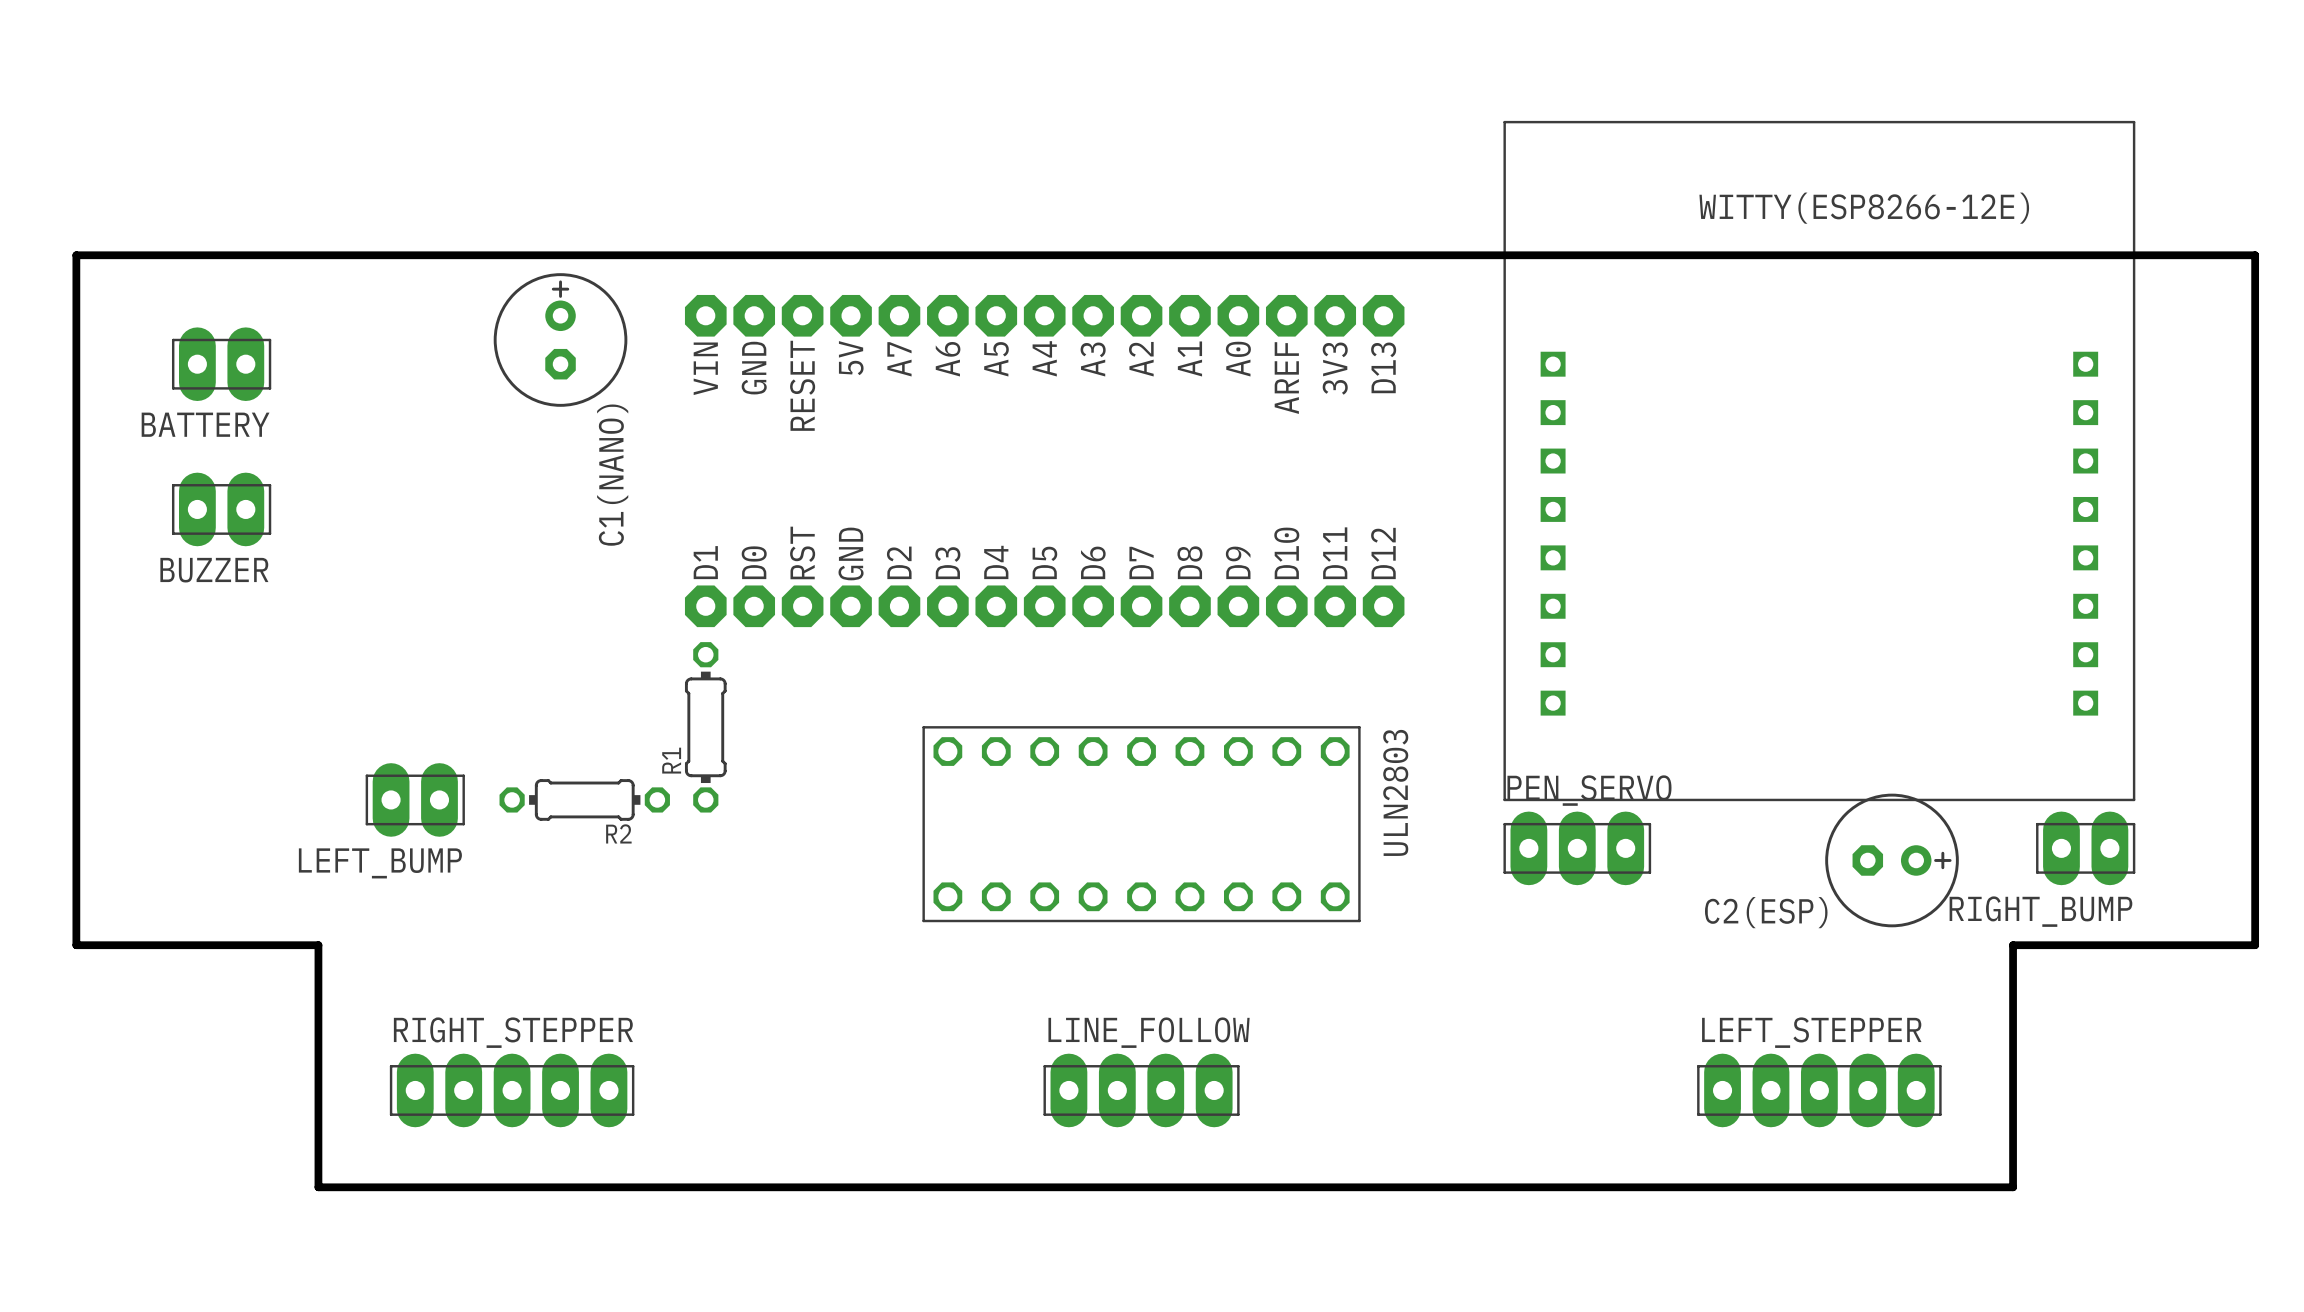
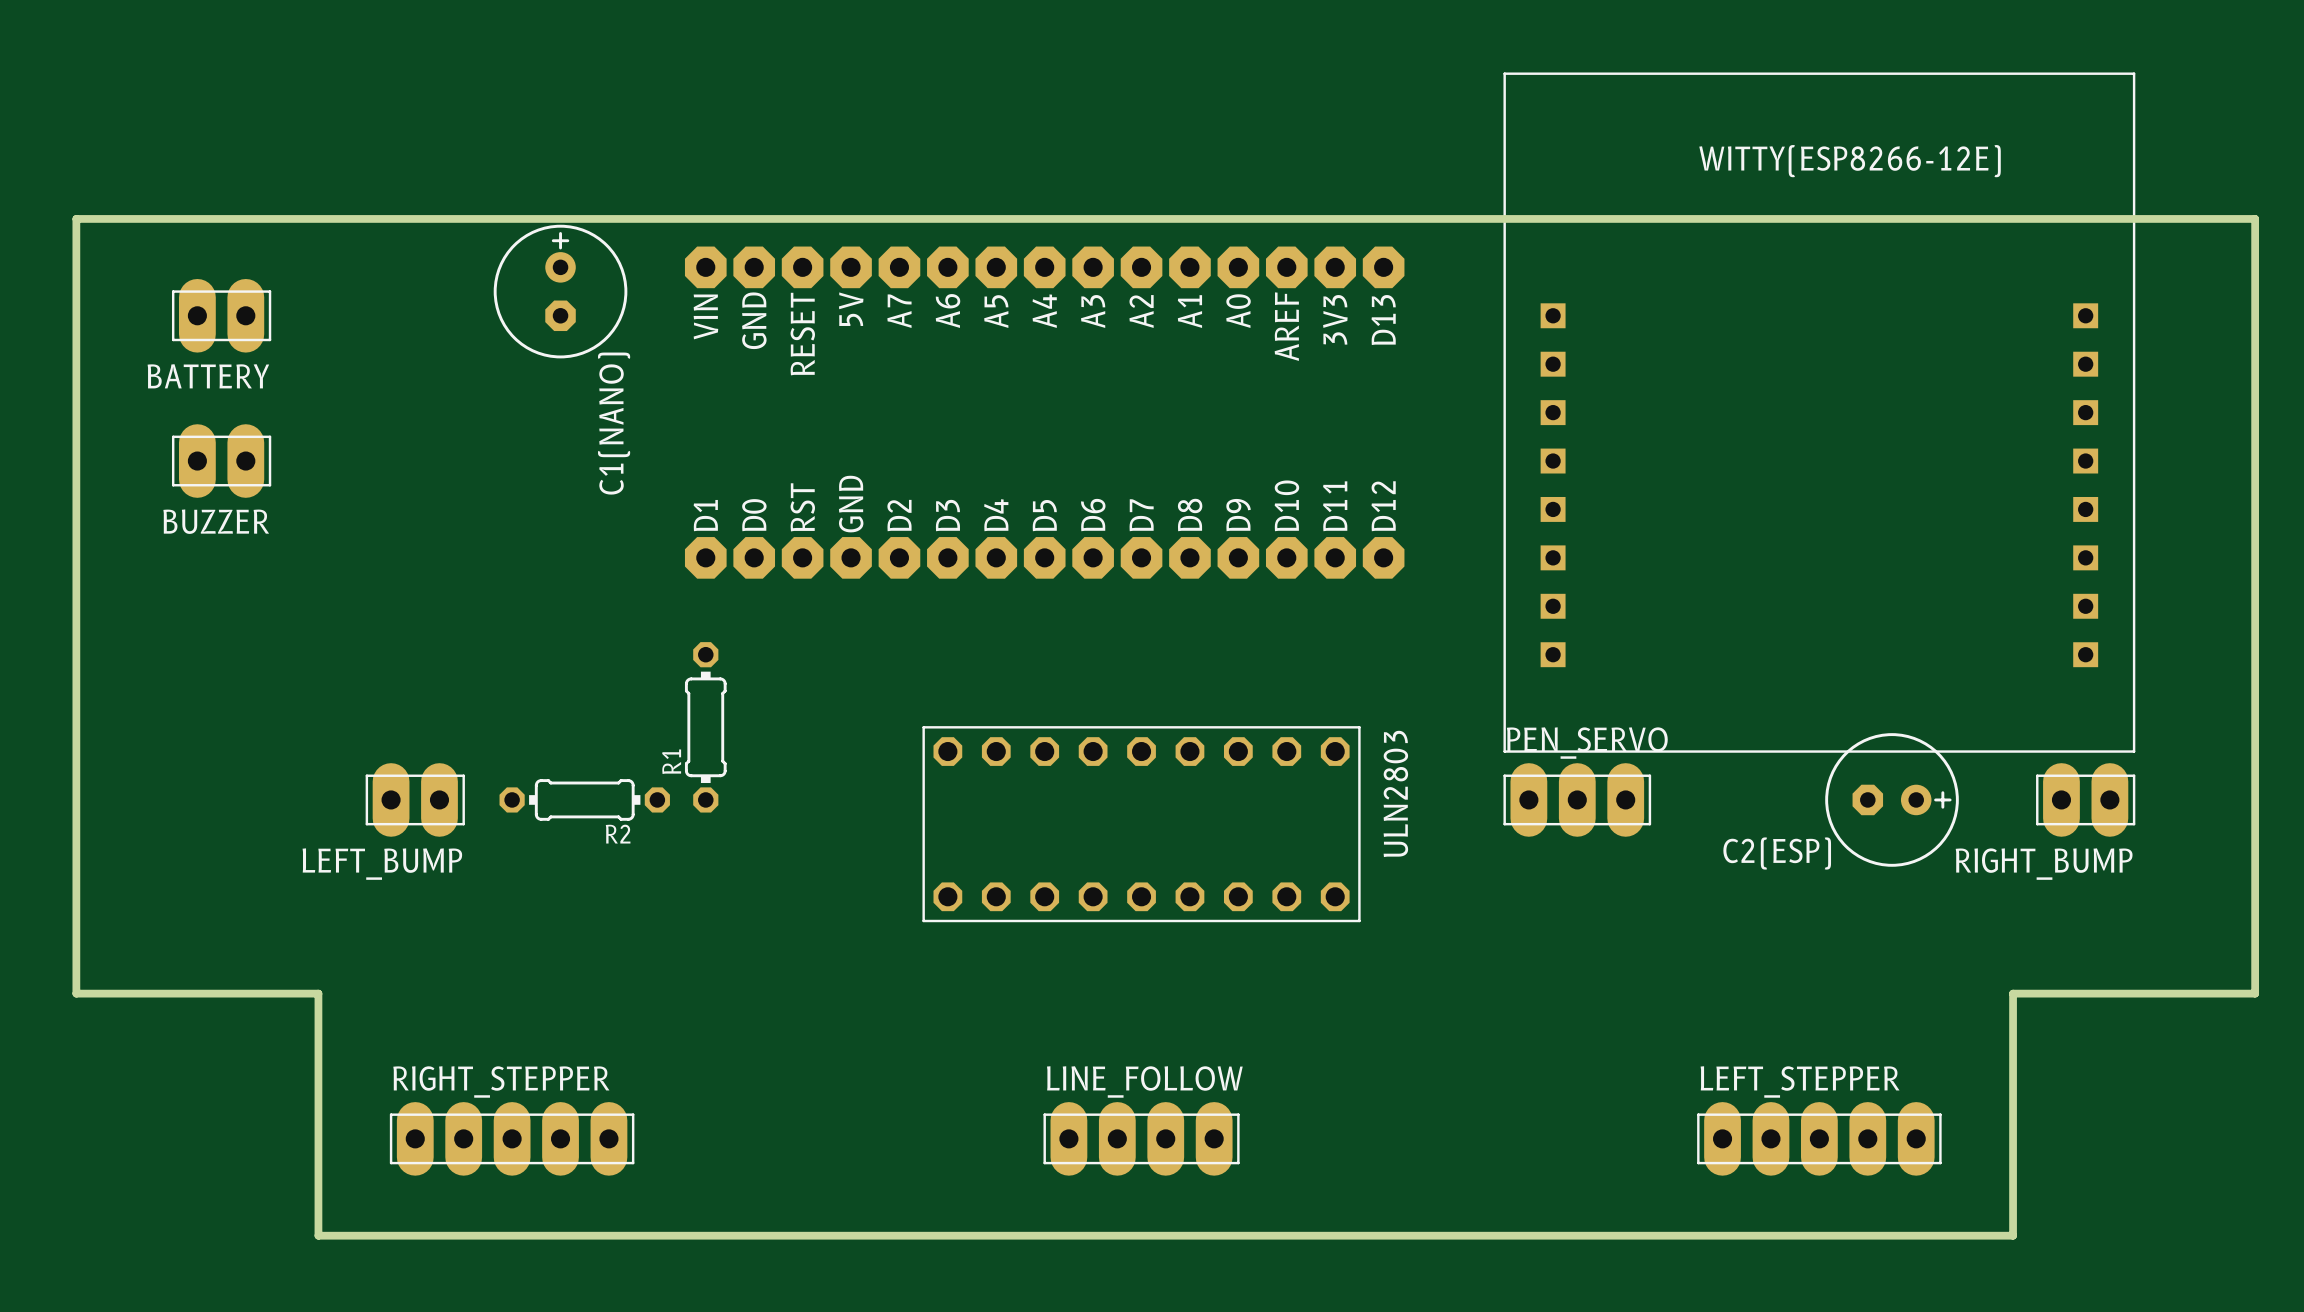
board edge: (76, 255) (2255, 255) -> (76, 255) (76, 218) (2255, 218) (2255, 255)
C1(NANO) position: (560, 339) -> (560, 291)
BATTERY position: (221, 364) -> (221, 315)
part position: (1044, 461) -> (1044, 412)
WITTY(ESP8266-12E) position: (1819, 461) -> (1819, 412)
BUZZER position: (221, 509) -> (221, 461)
PEN_SERVO position: (1577, 848) -> (1577, 799)
RIGHT_BUMP position: (2085, 848) -> (2085, 799)
C2(ESP) position: (1892, 860) -> (1892, 799)
board edge: (76, 945) (318, 945) (318, 993) -> (76, 945) (76, 993) (318, 993)
board edge: (2255, 945) (2013, 945) (2013, 993) -> (2255, 945) (2255, 993) (2013, 993)
RIGHT_STEPPER position: (512, 1090) -> (512, 1138)
LINE_FOLLOW position: (1141, 1090) -> (1141, 1138)
LEFT_STEPPER position: (1819, 1090) -> (1819, 1138)
board edge: (318, 1187) (2013, 1187) -> (318, 1187) (318, 1235) (2013, 1235) (2013, 1187)

